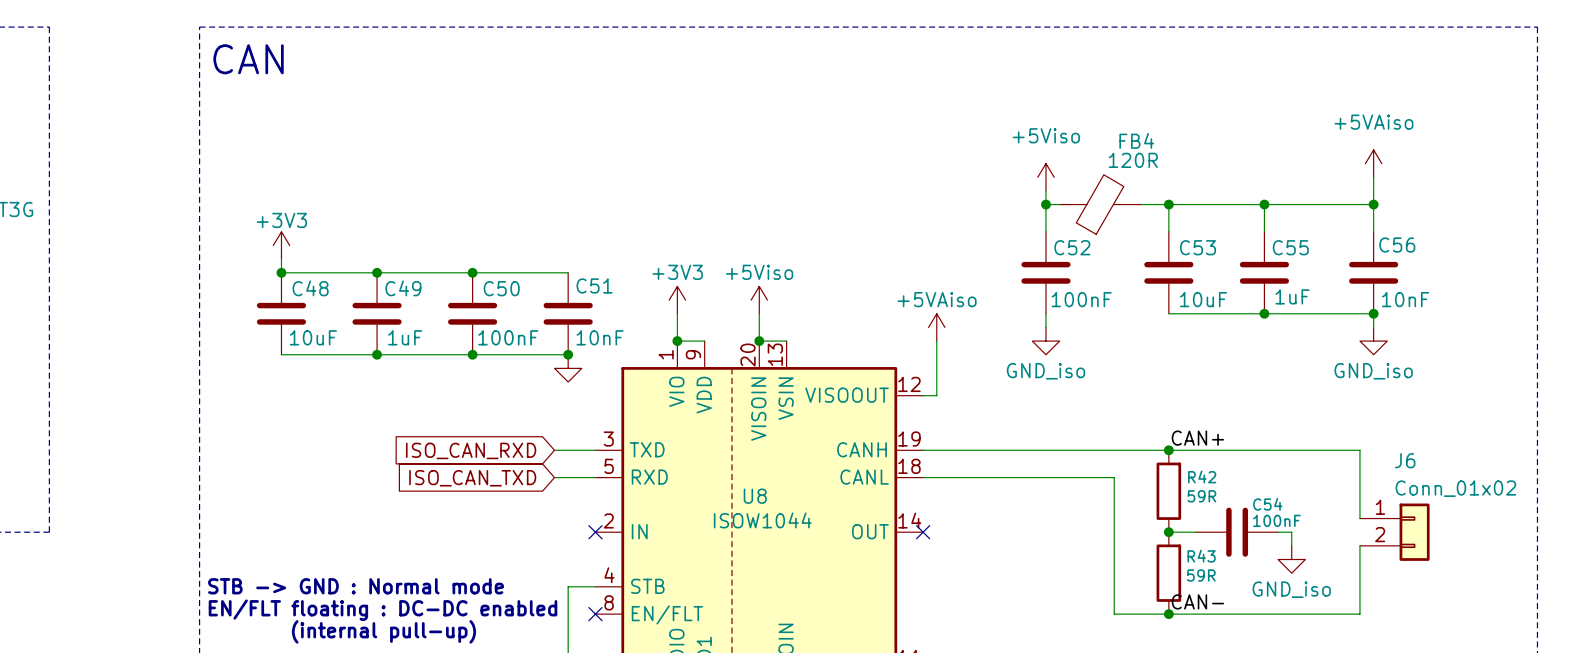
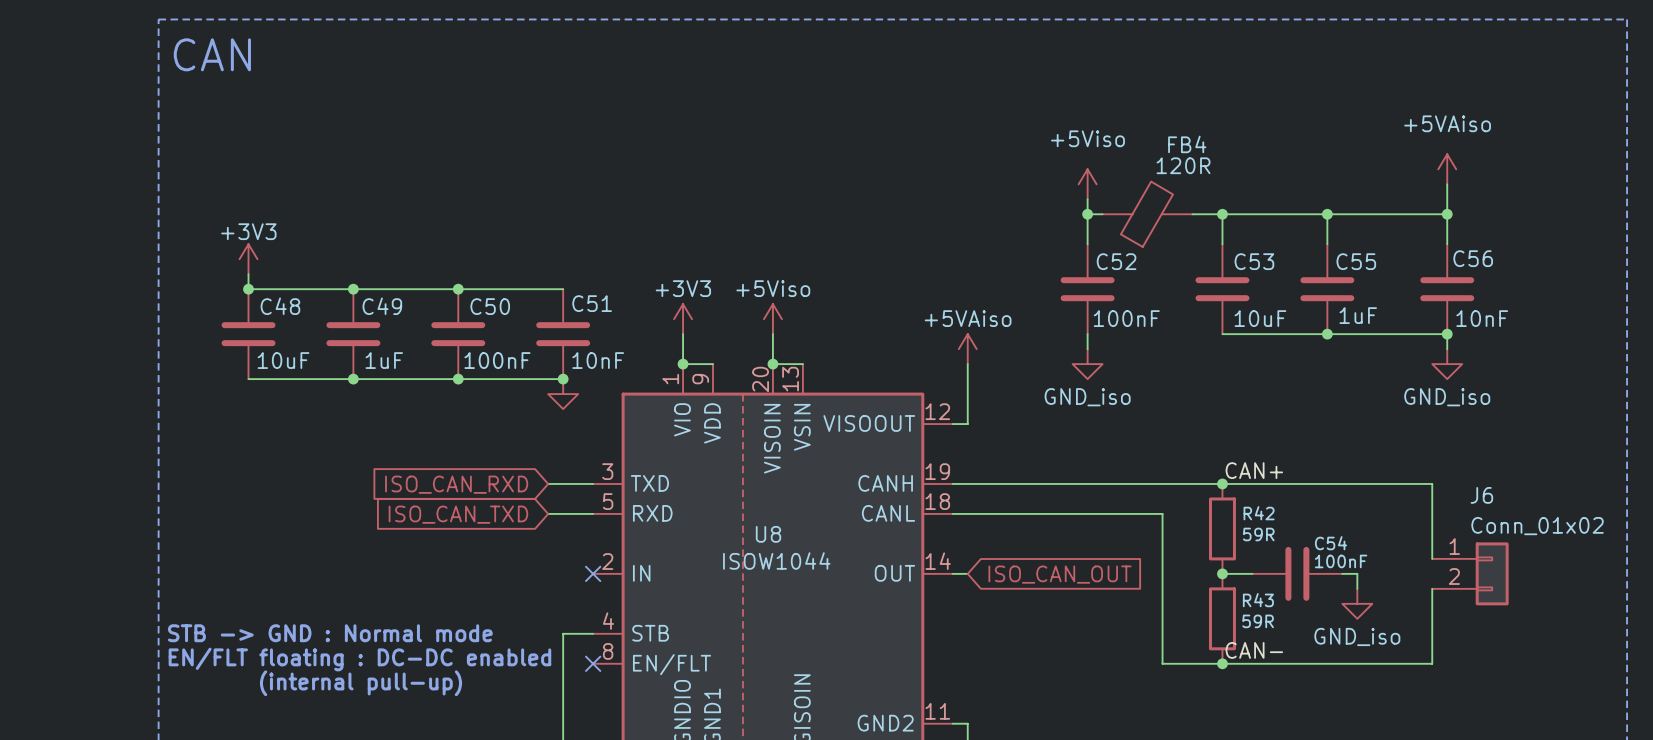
wire: none -> (952, 573) (967, 573)
no-connect mark: (923, 532) -> none
global label: none -> ISO_CAN_OUT (1059, 574)

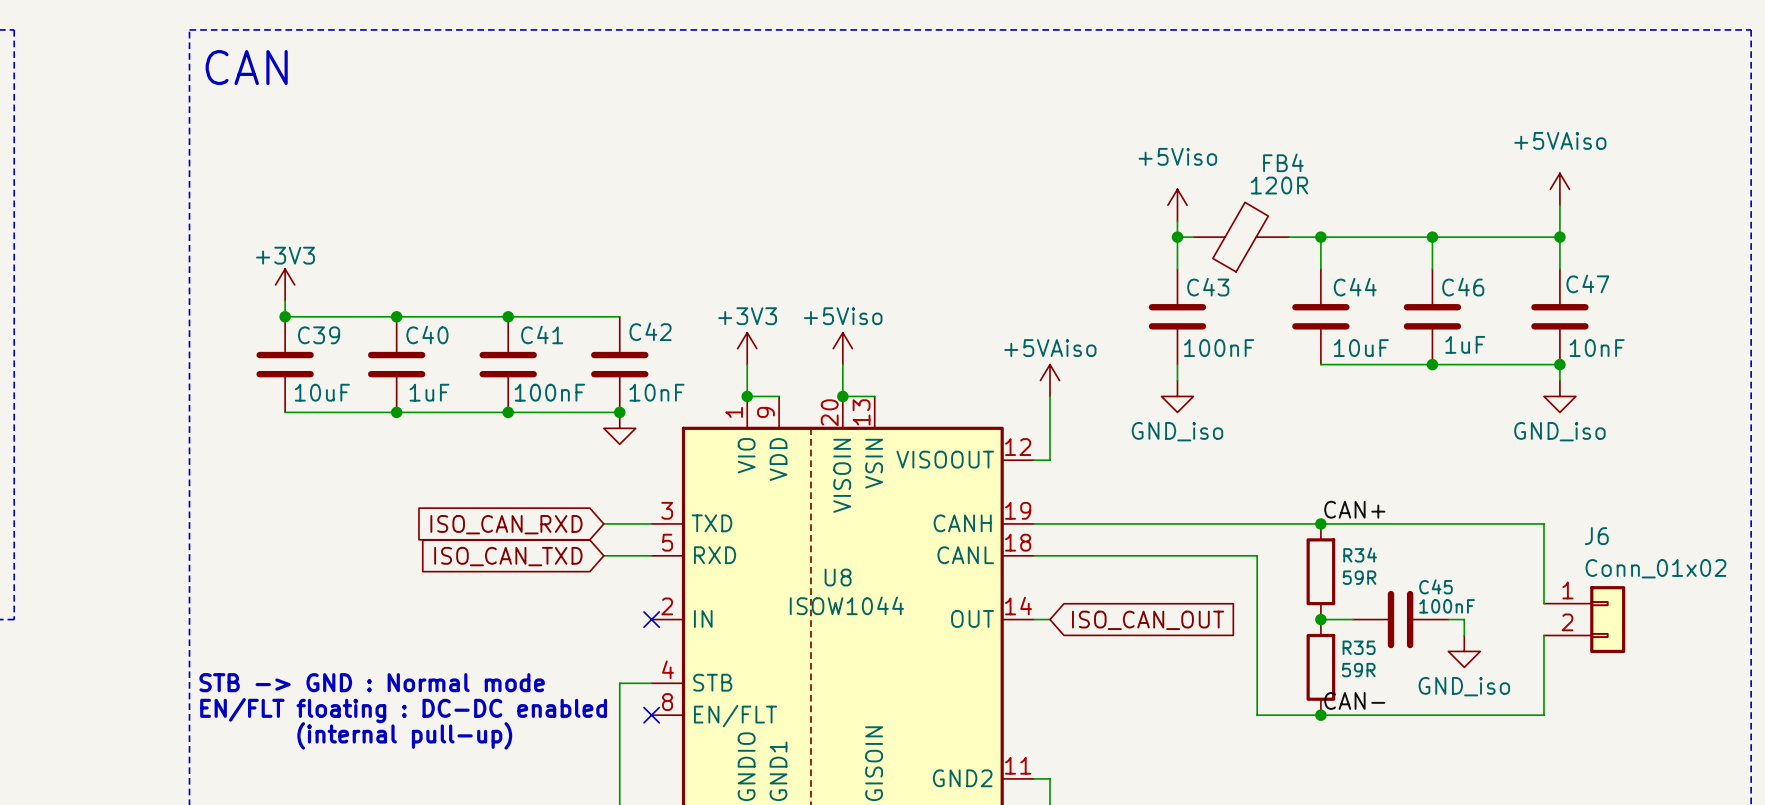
C56 name: C56 (1473, 258) -> C47 (1587, 283)
C52 name: C52 (1116, 261) -> C43 (1208, 287)
C53 name: C53 (1254, 261) -> C44 (1355, 287)
C55 name: C55 (1356, 261) -> C46 (1463, 287)
C51 name: C51 (592, 303) -> C42 (650, 331)
C48 name: C48 (280, 306) -> C39 (319, 335)
C49 name: C49 (382, 306) -> C40 (427, 334)
C50 name: C50 (490, 306) -> C41 (542, 334)
R42 name: R42 (1259, 513) -> R34 (1360, 555)
C54 name: C54 (1330, 543) -> C45 (1435, 586)
R43 name: R43 (1258, 600) -> R35 (1359, 647)

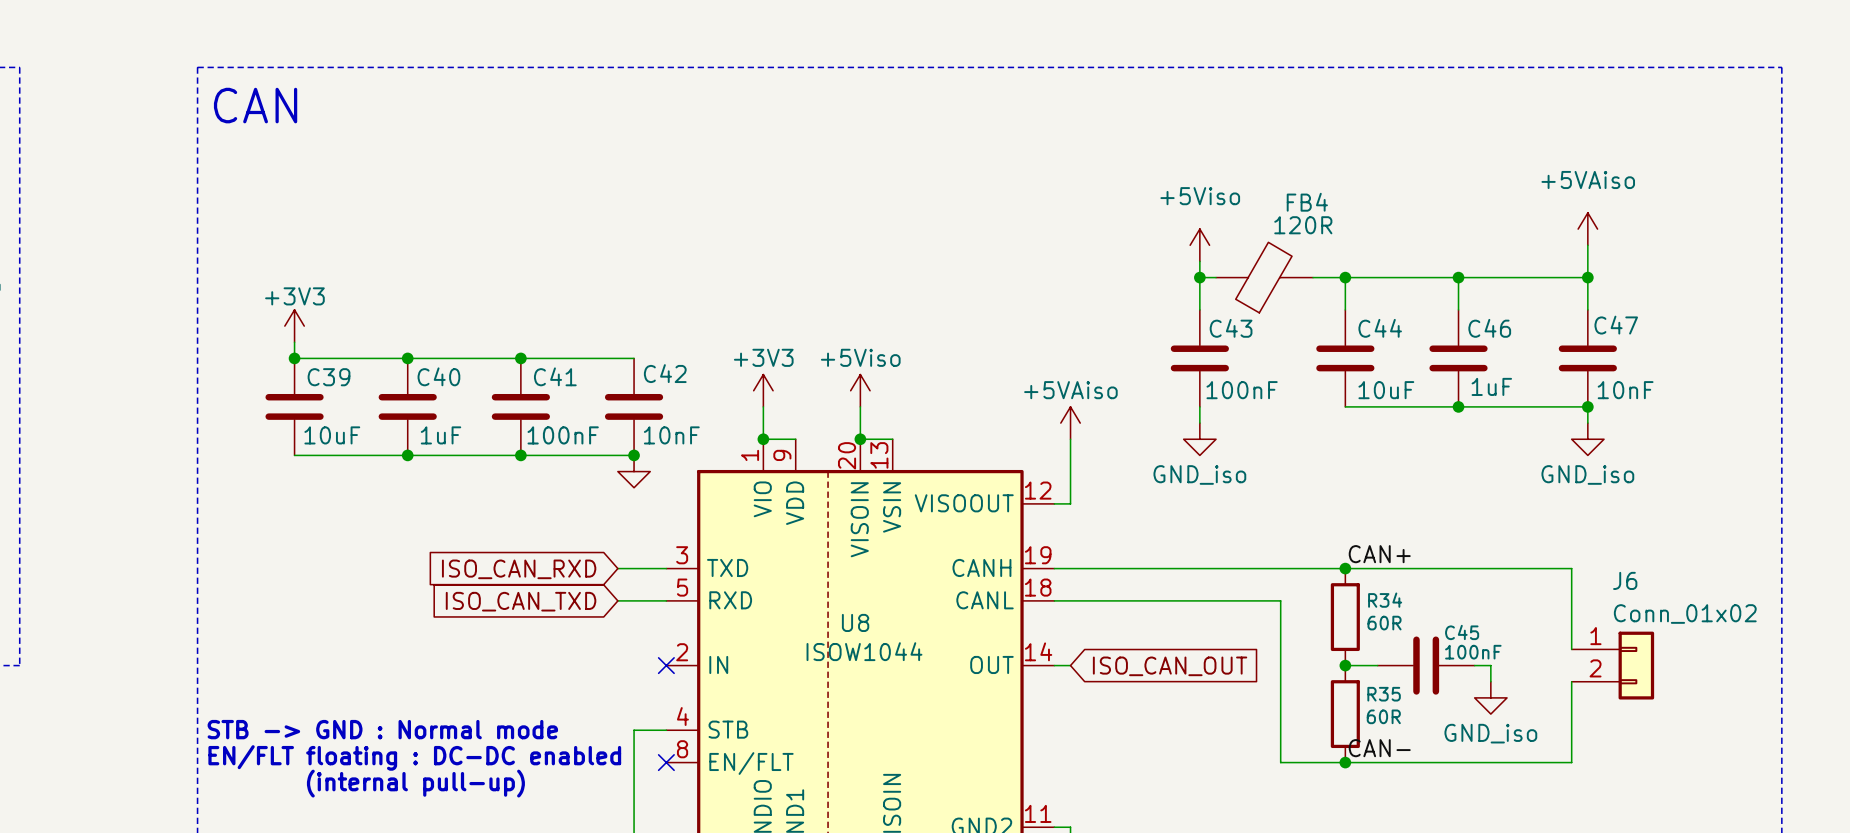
R34 value: 59R (1359, 577) -> 60R (1384, 623)
R35 value: 59R (1358, 670) -> 60R (1383, 716)

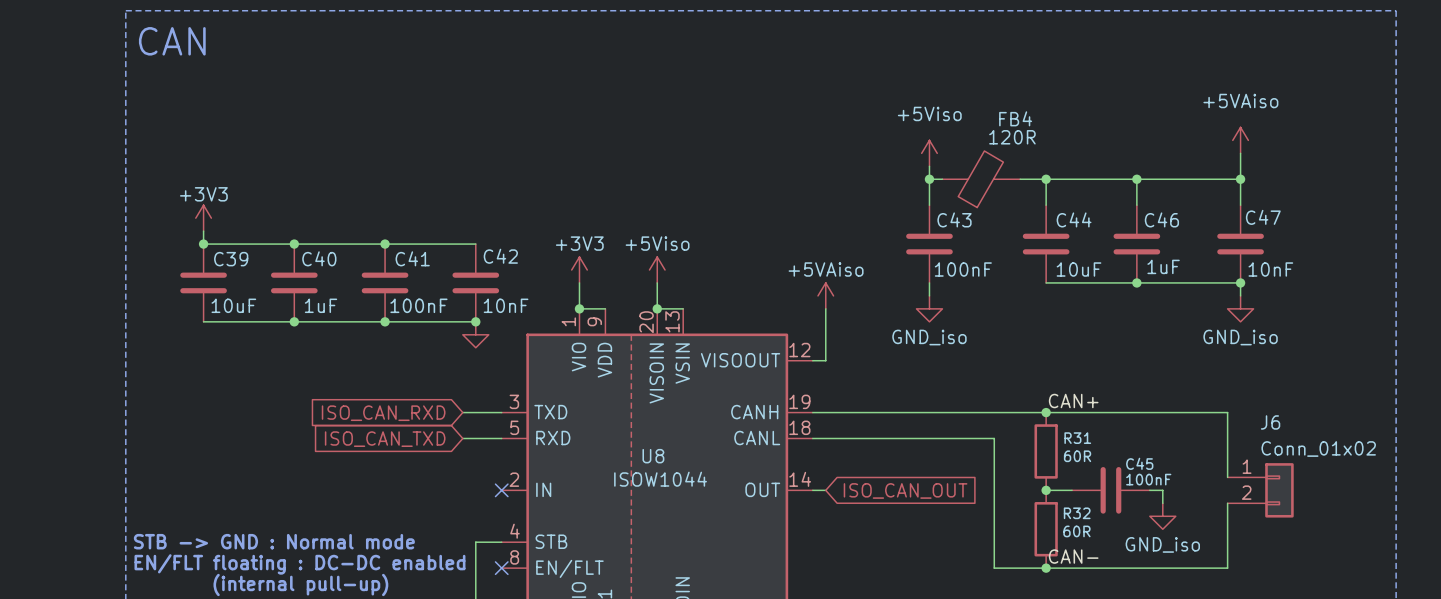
R34 name: R34 (1385, 600) -> R31 (1077, 438)
R35 name: R35 (1384, 694) -> R32 (1077, 513)

